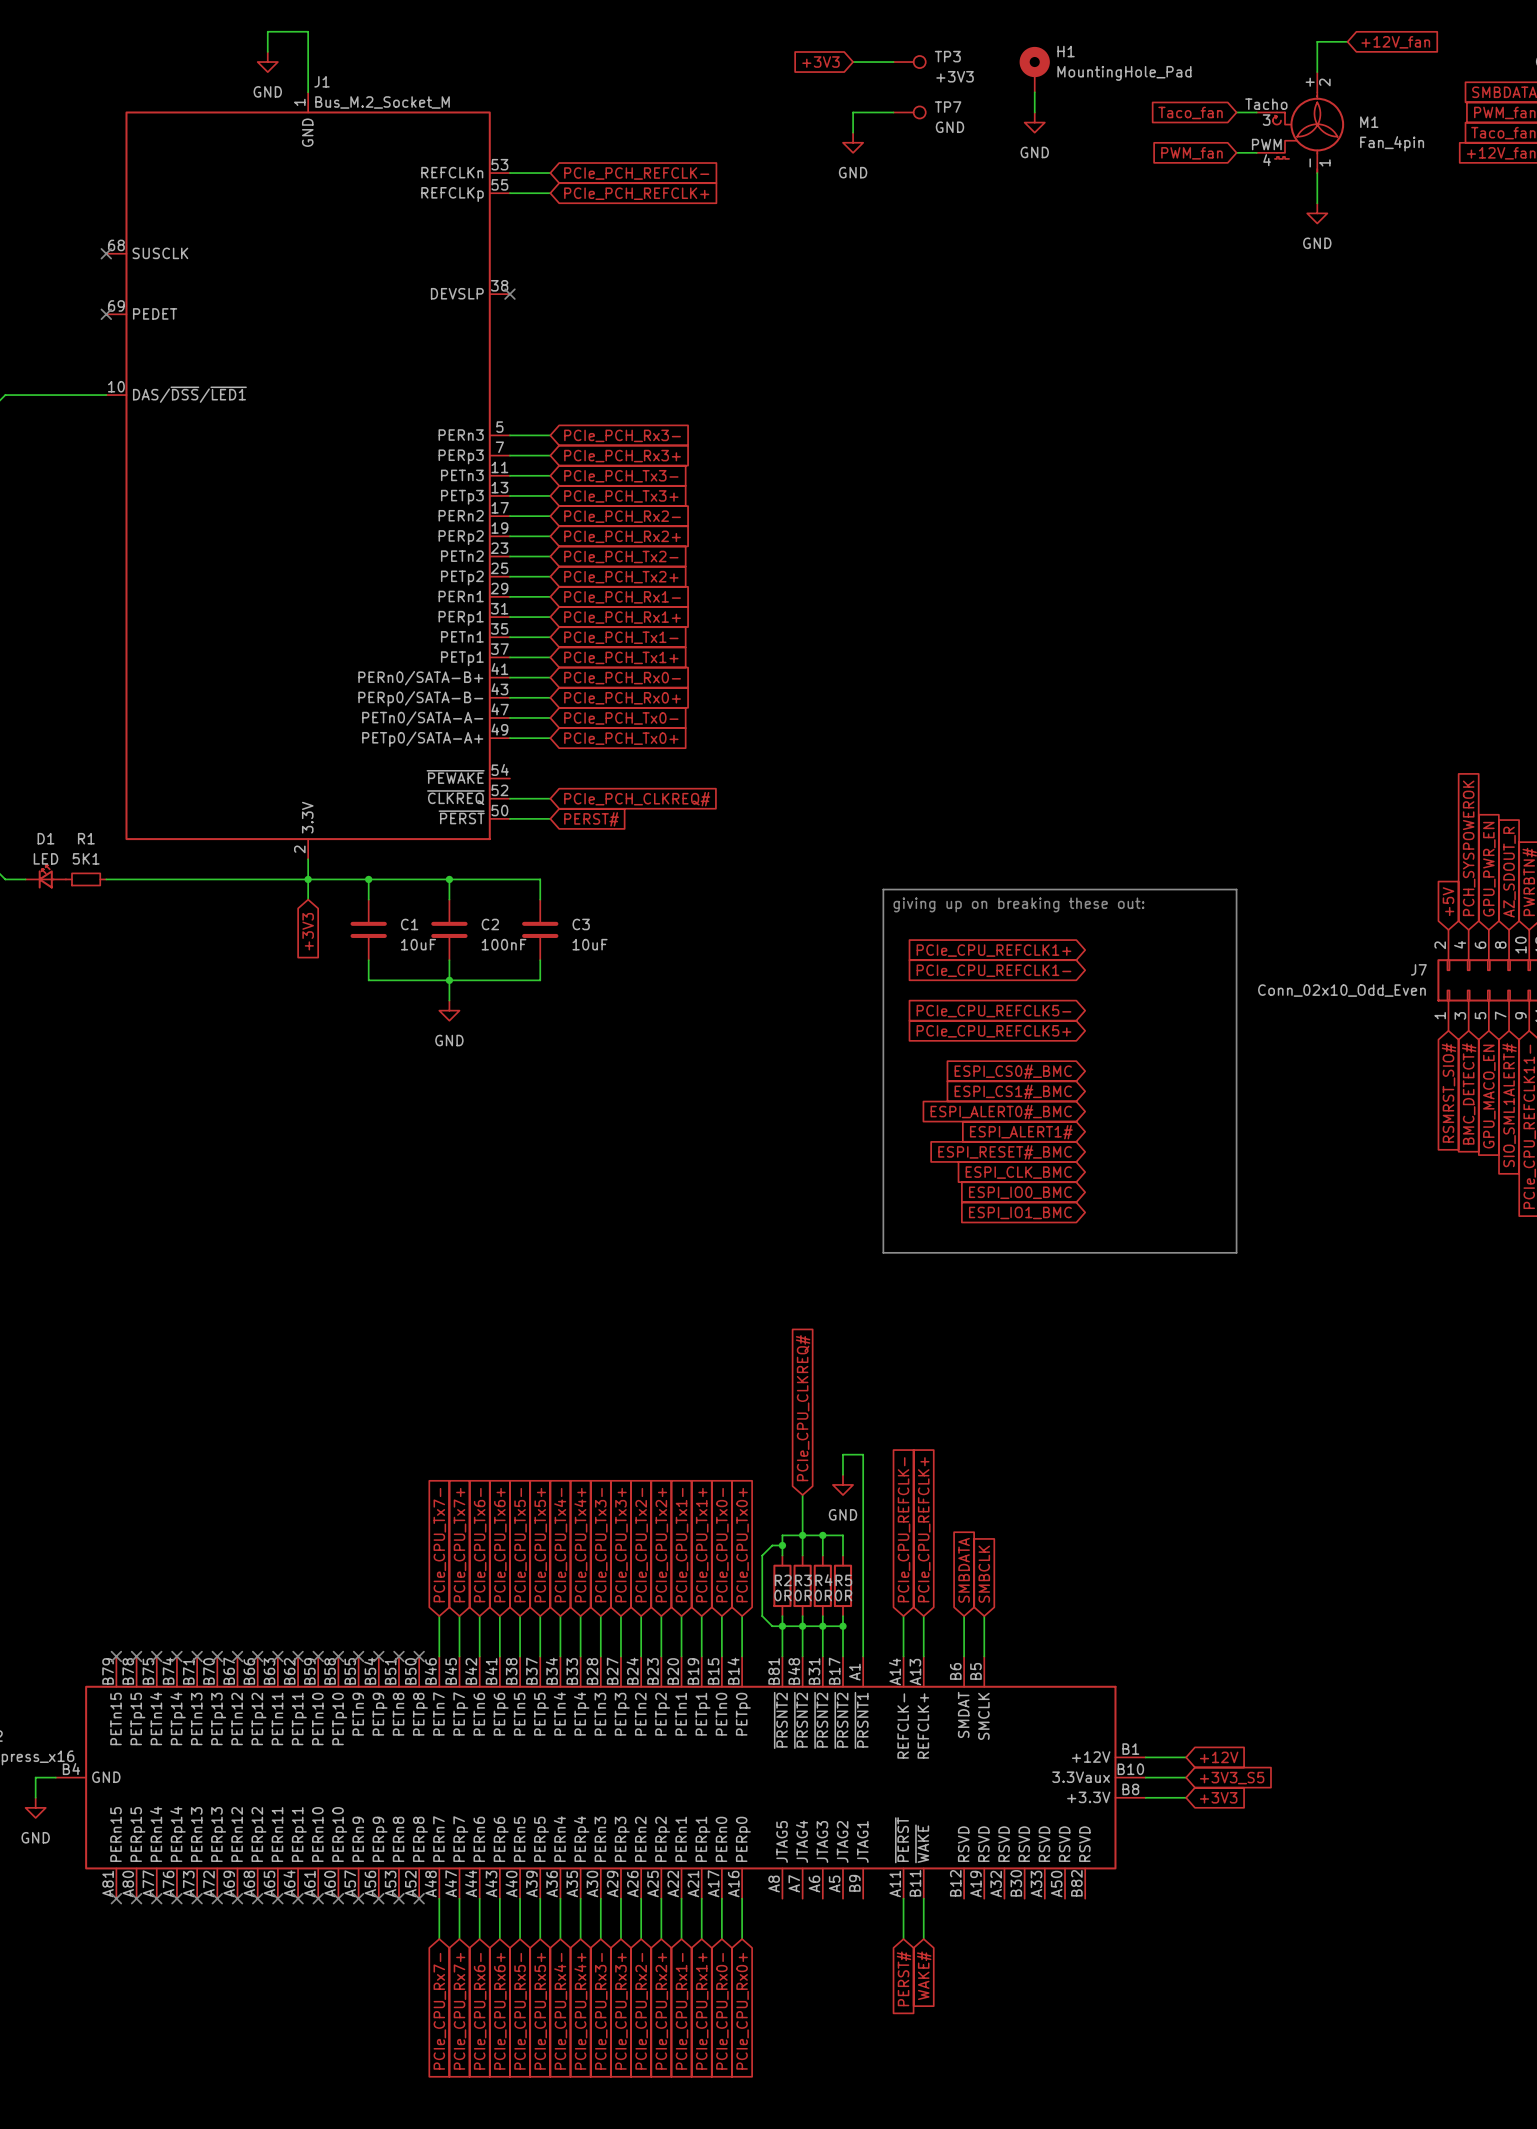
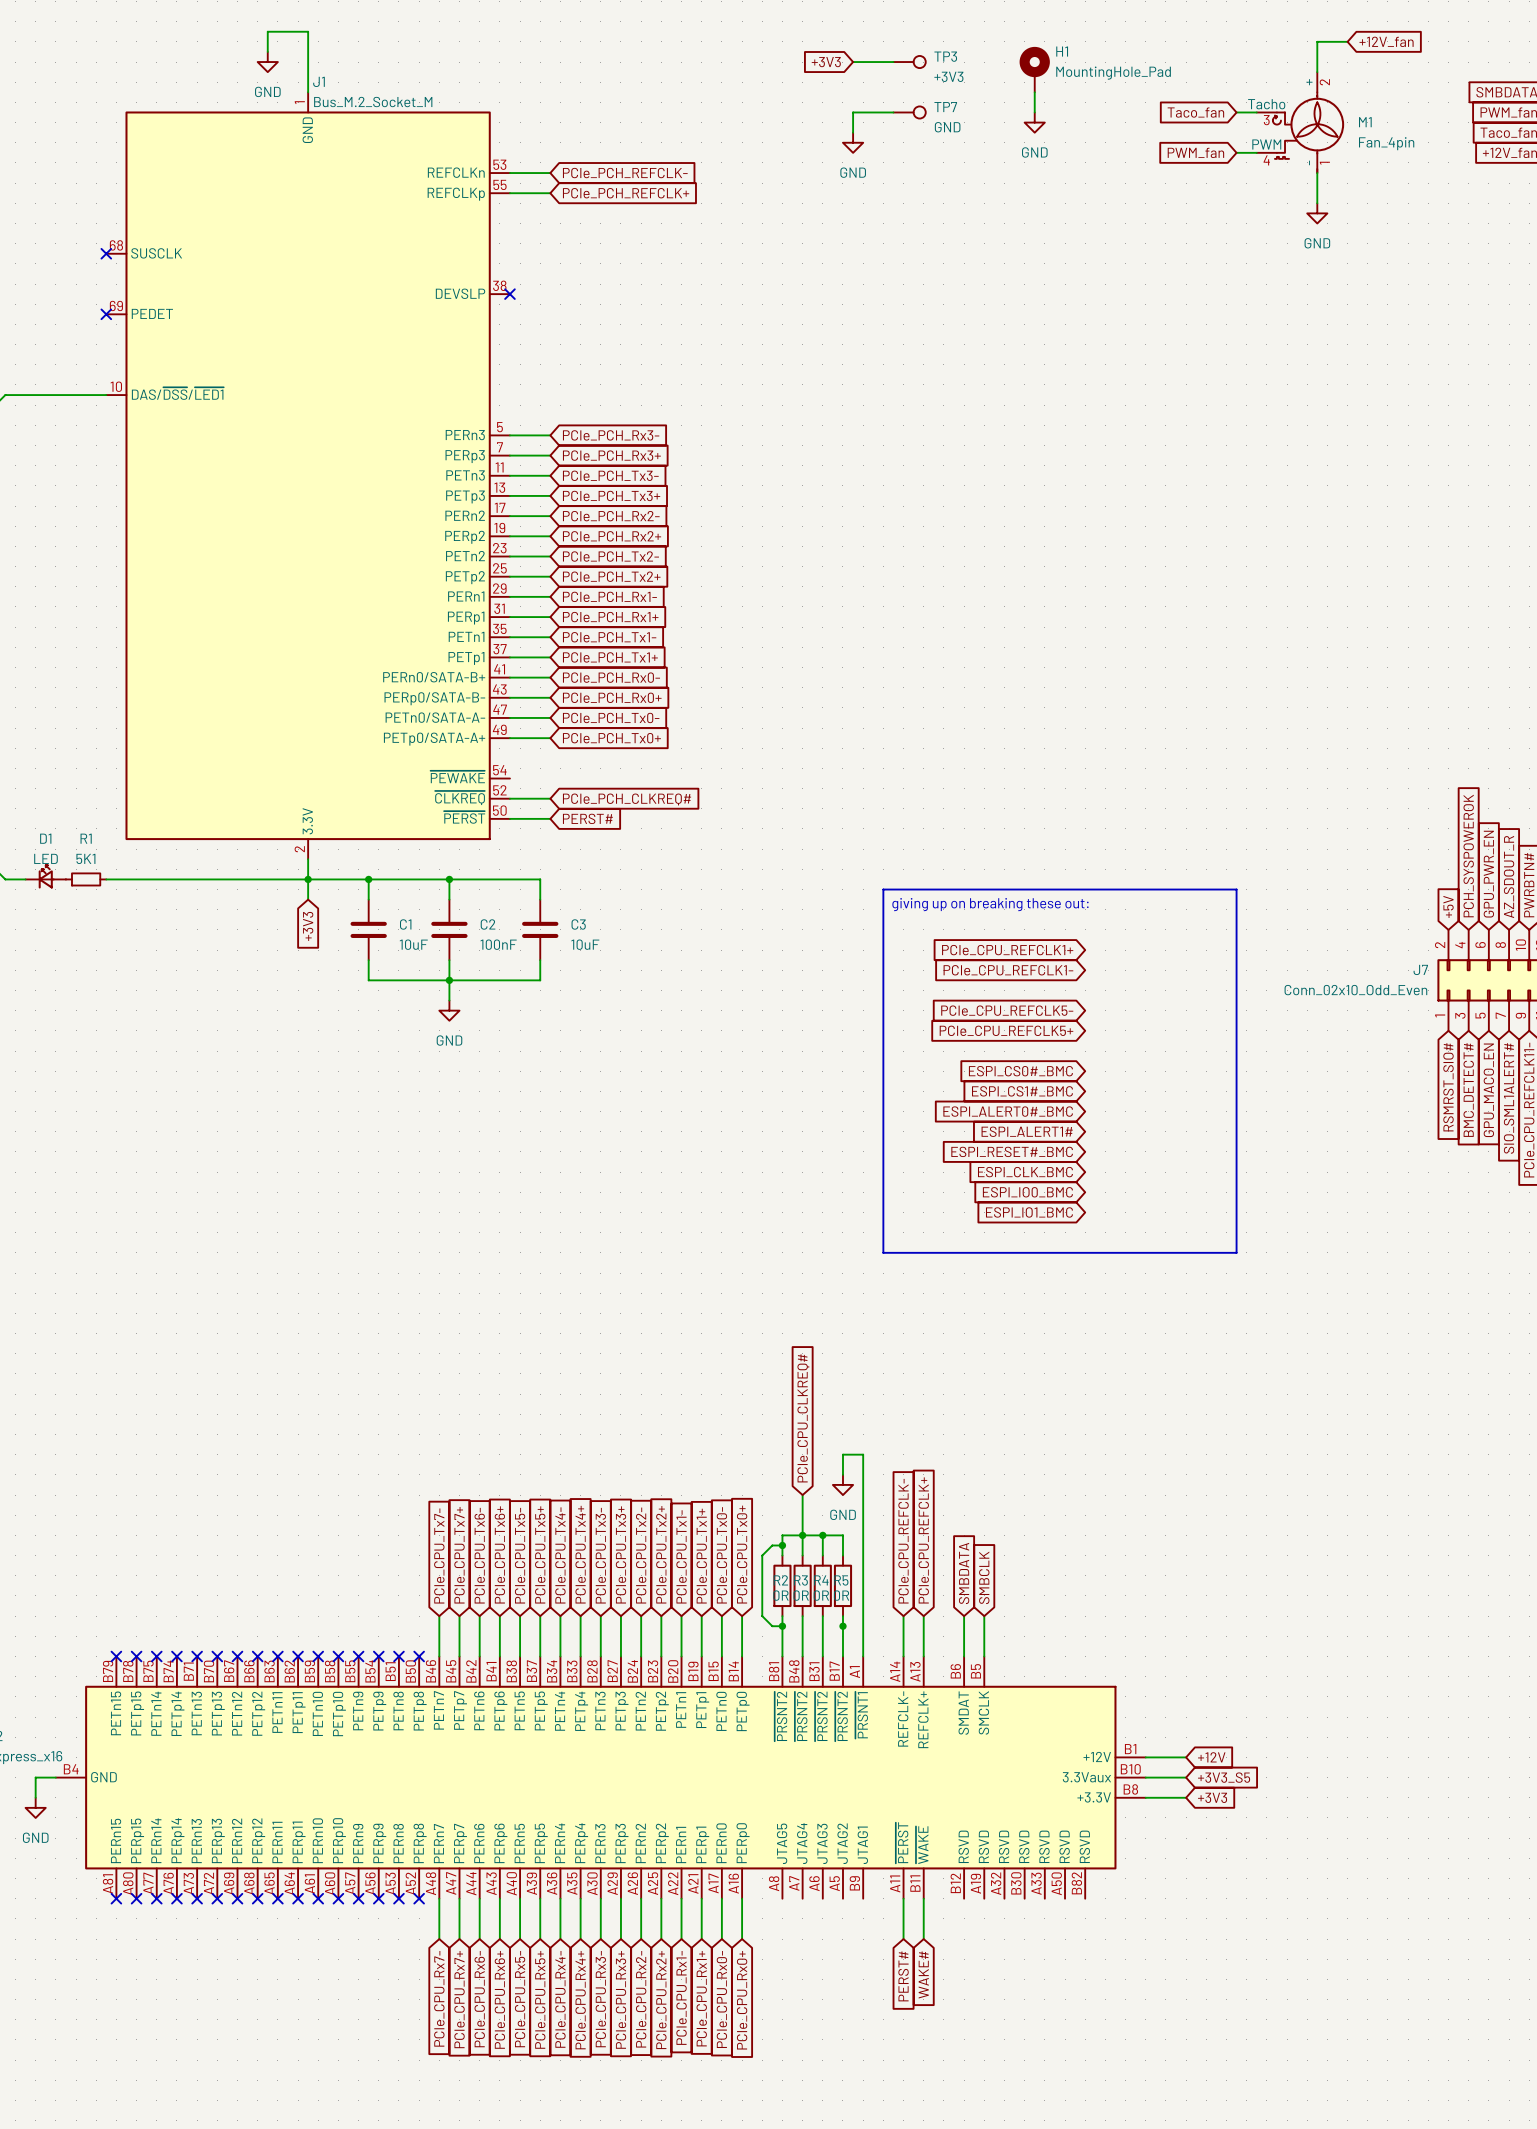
wire: (782, 1626) (842, 1626) -> none
junction: (802, 1626) -> none
junction: (822, 1626) -> none

